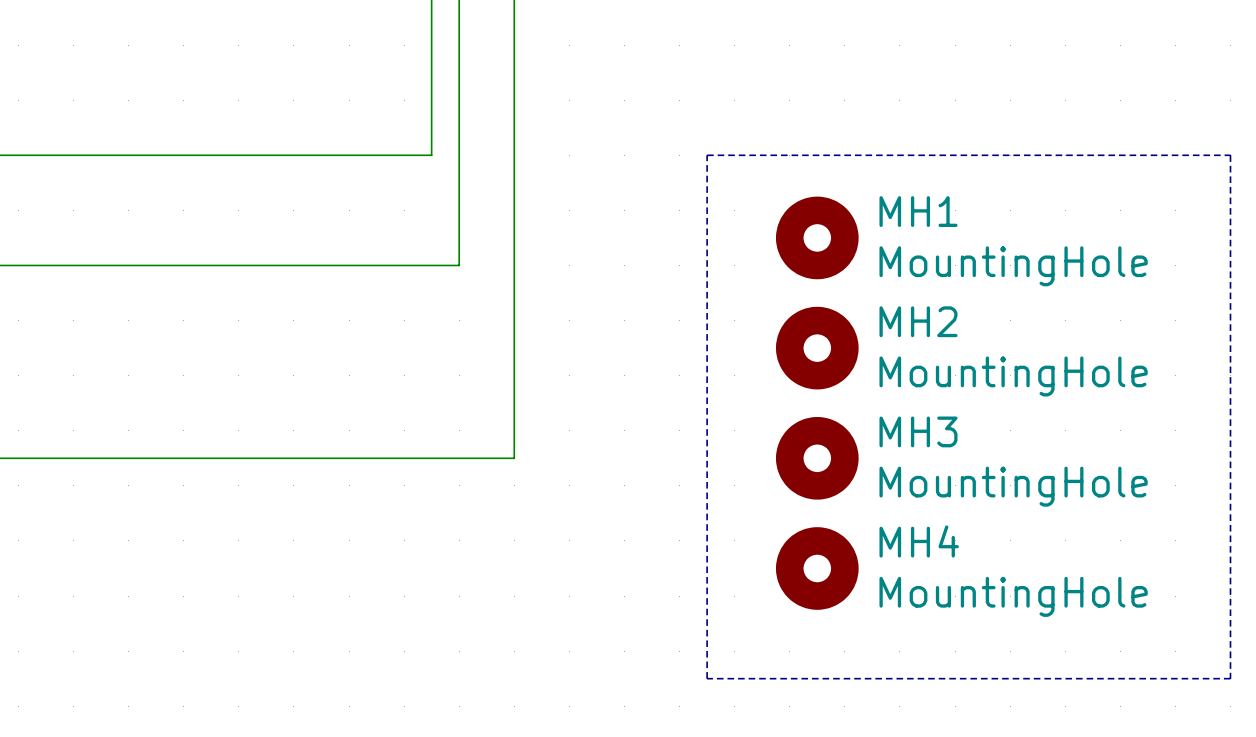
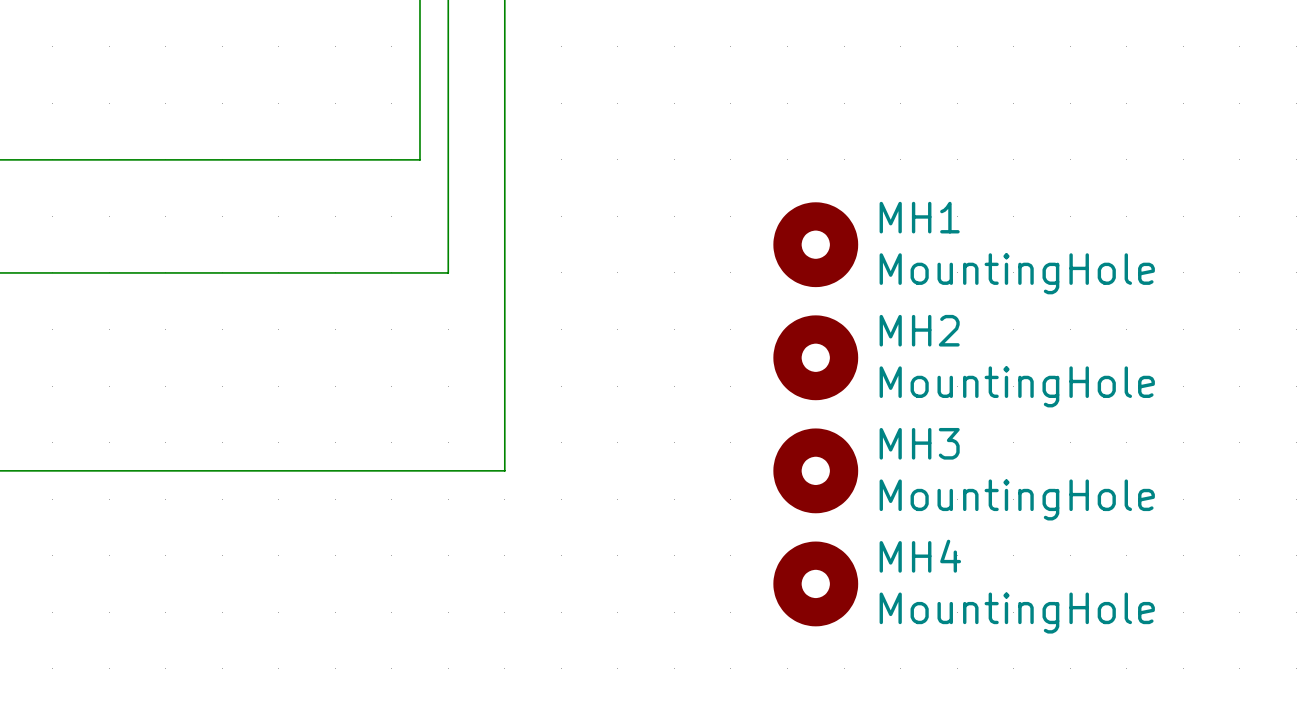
line: (707, 155) (1230, 155) (1230, 678) (707, 678) (707, 155) -> none

